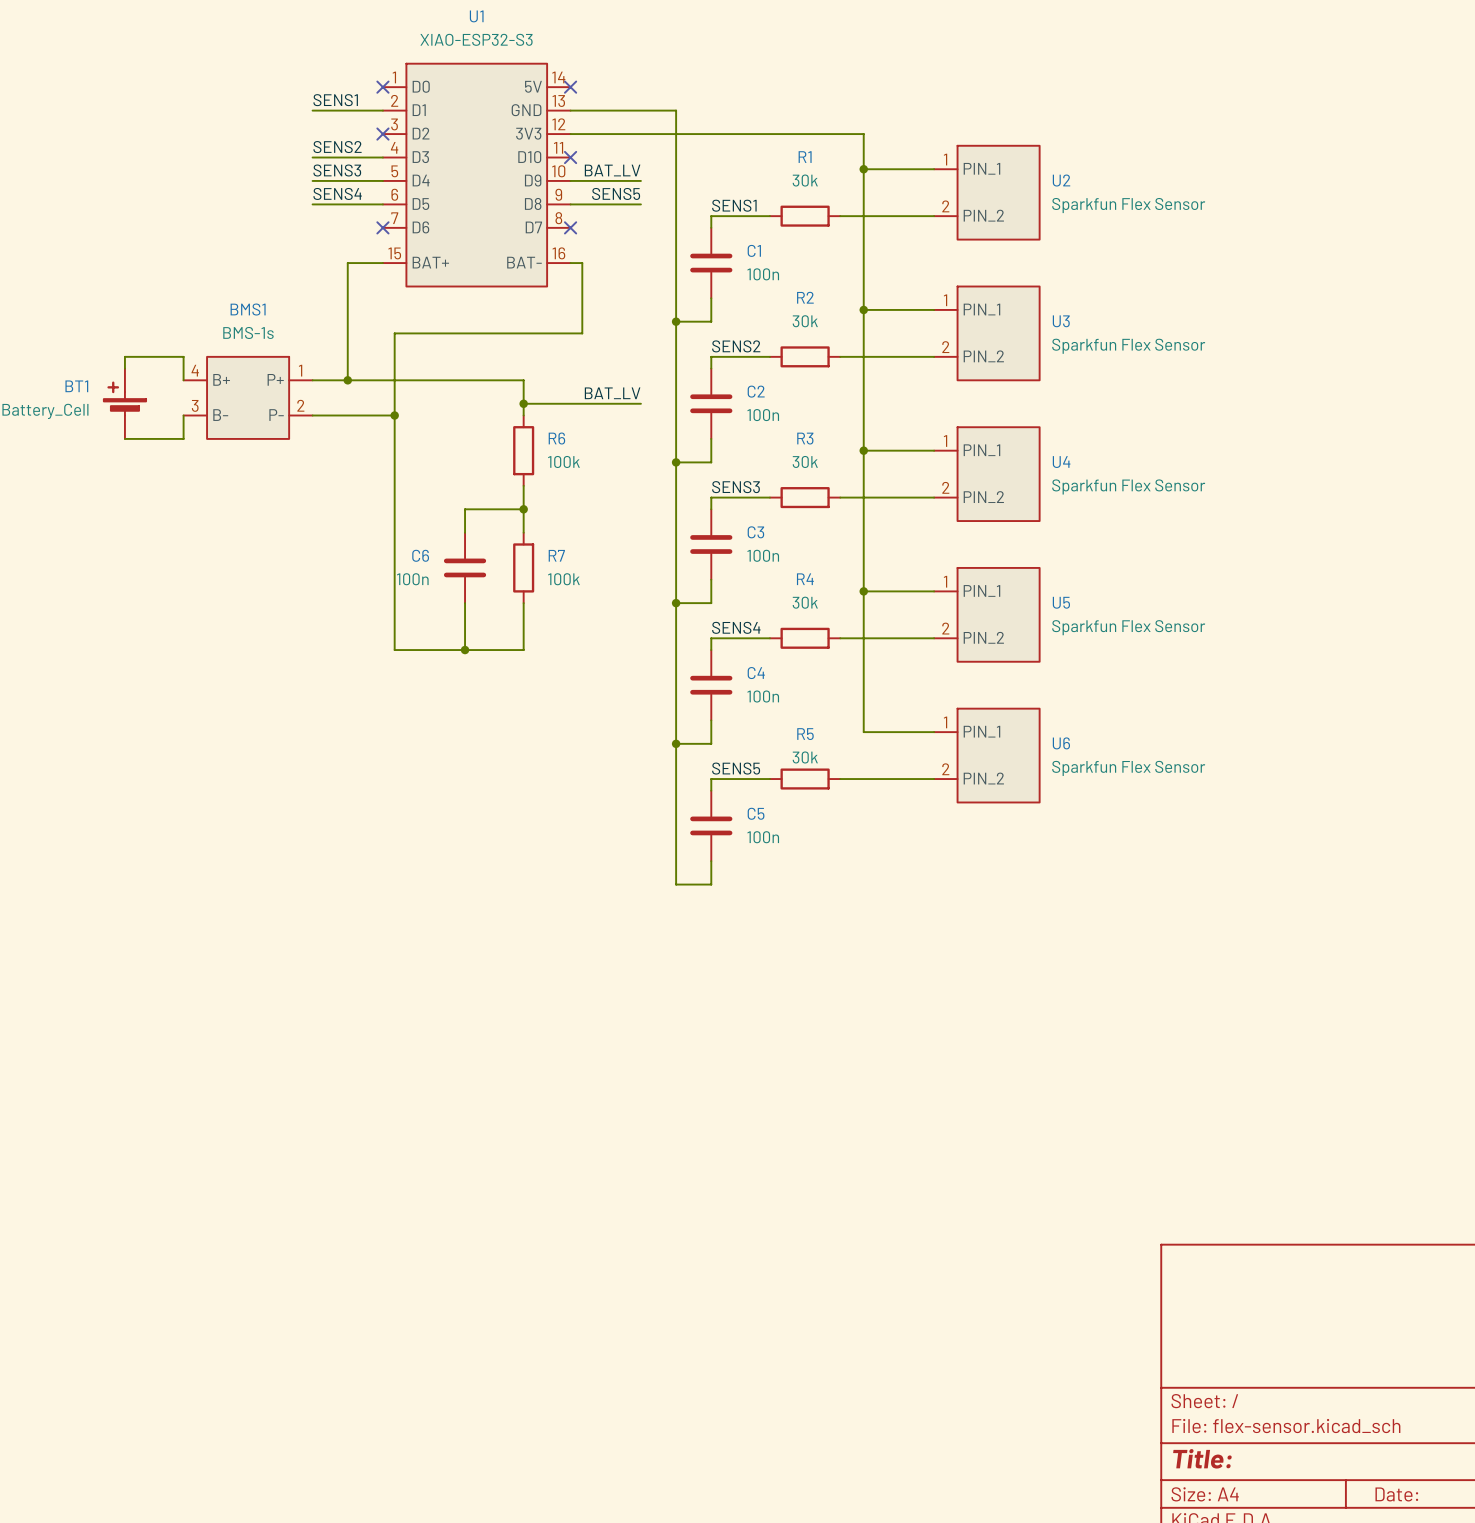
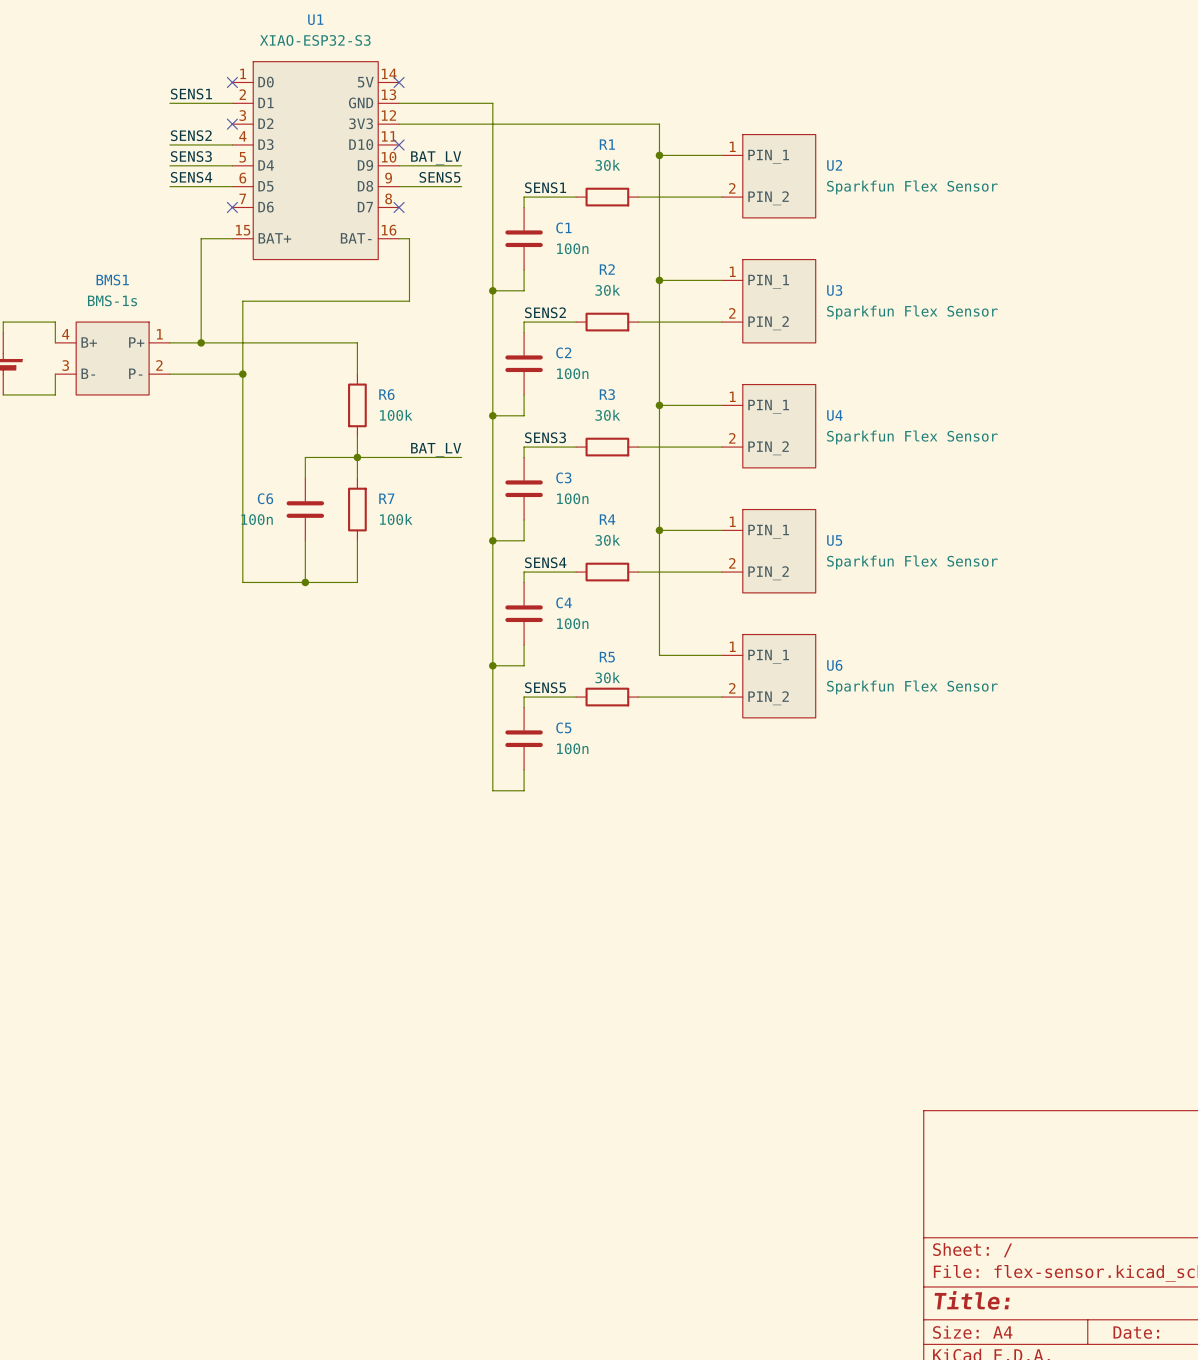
label position: BAT_LV (612, 393) -> BAT_LV (436, 449)
wire: (523, 403) (640, 403) -> (357, 457) (461, 457)
junction: (523, 403) -> none

